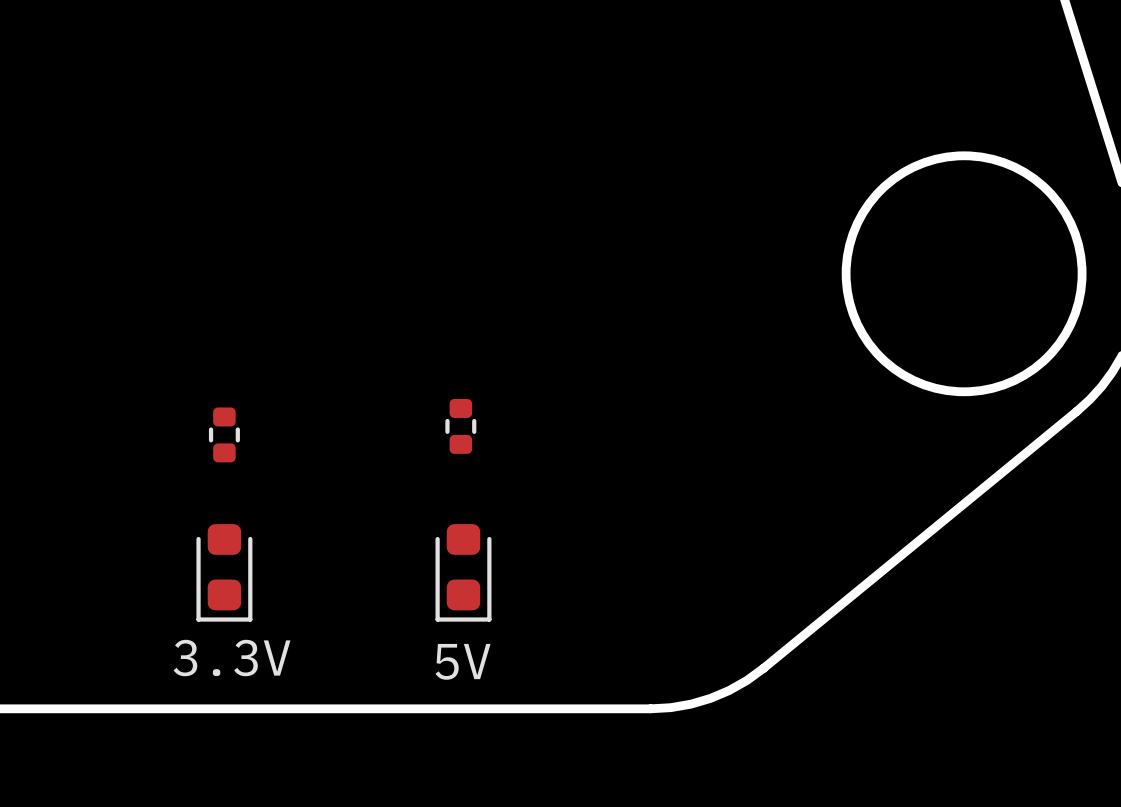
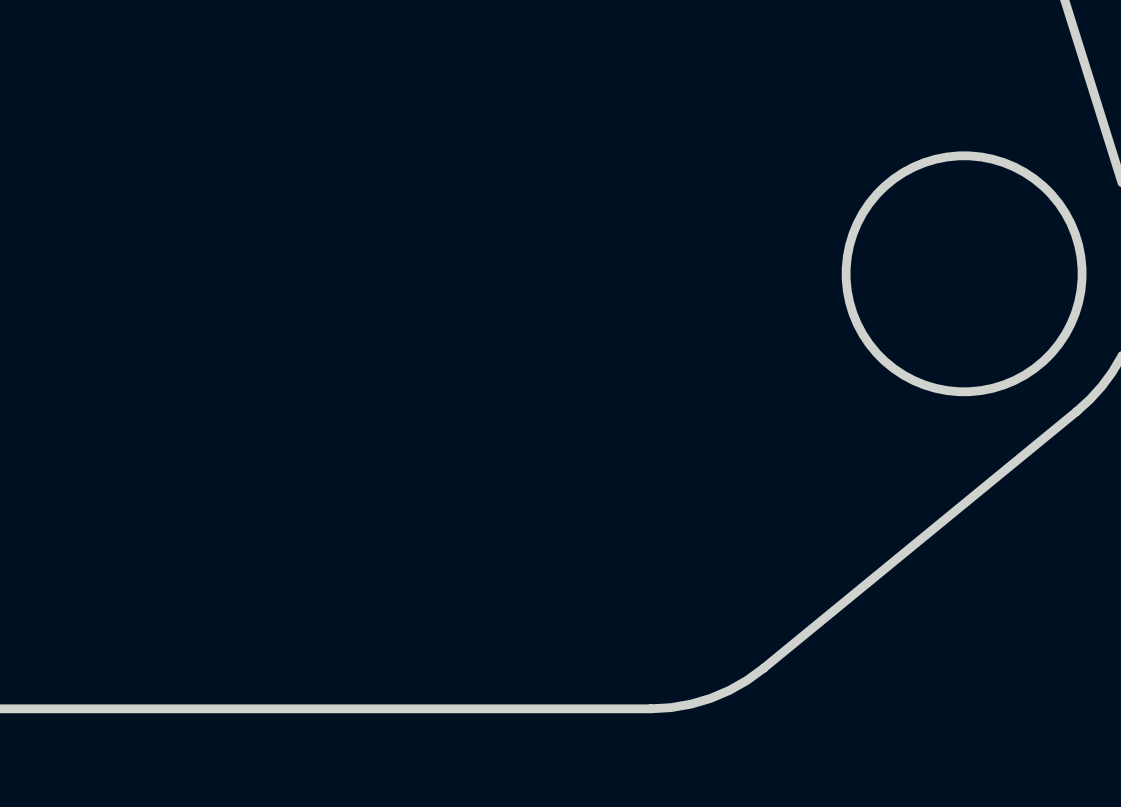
part: (460, 426) -> none
part: (224, 434) -> none
part: (224, 572) -> none
part: (463, 572) -> none
text: 3.3V (232, 658) -> none
text: 5V (463, 661) -> none

